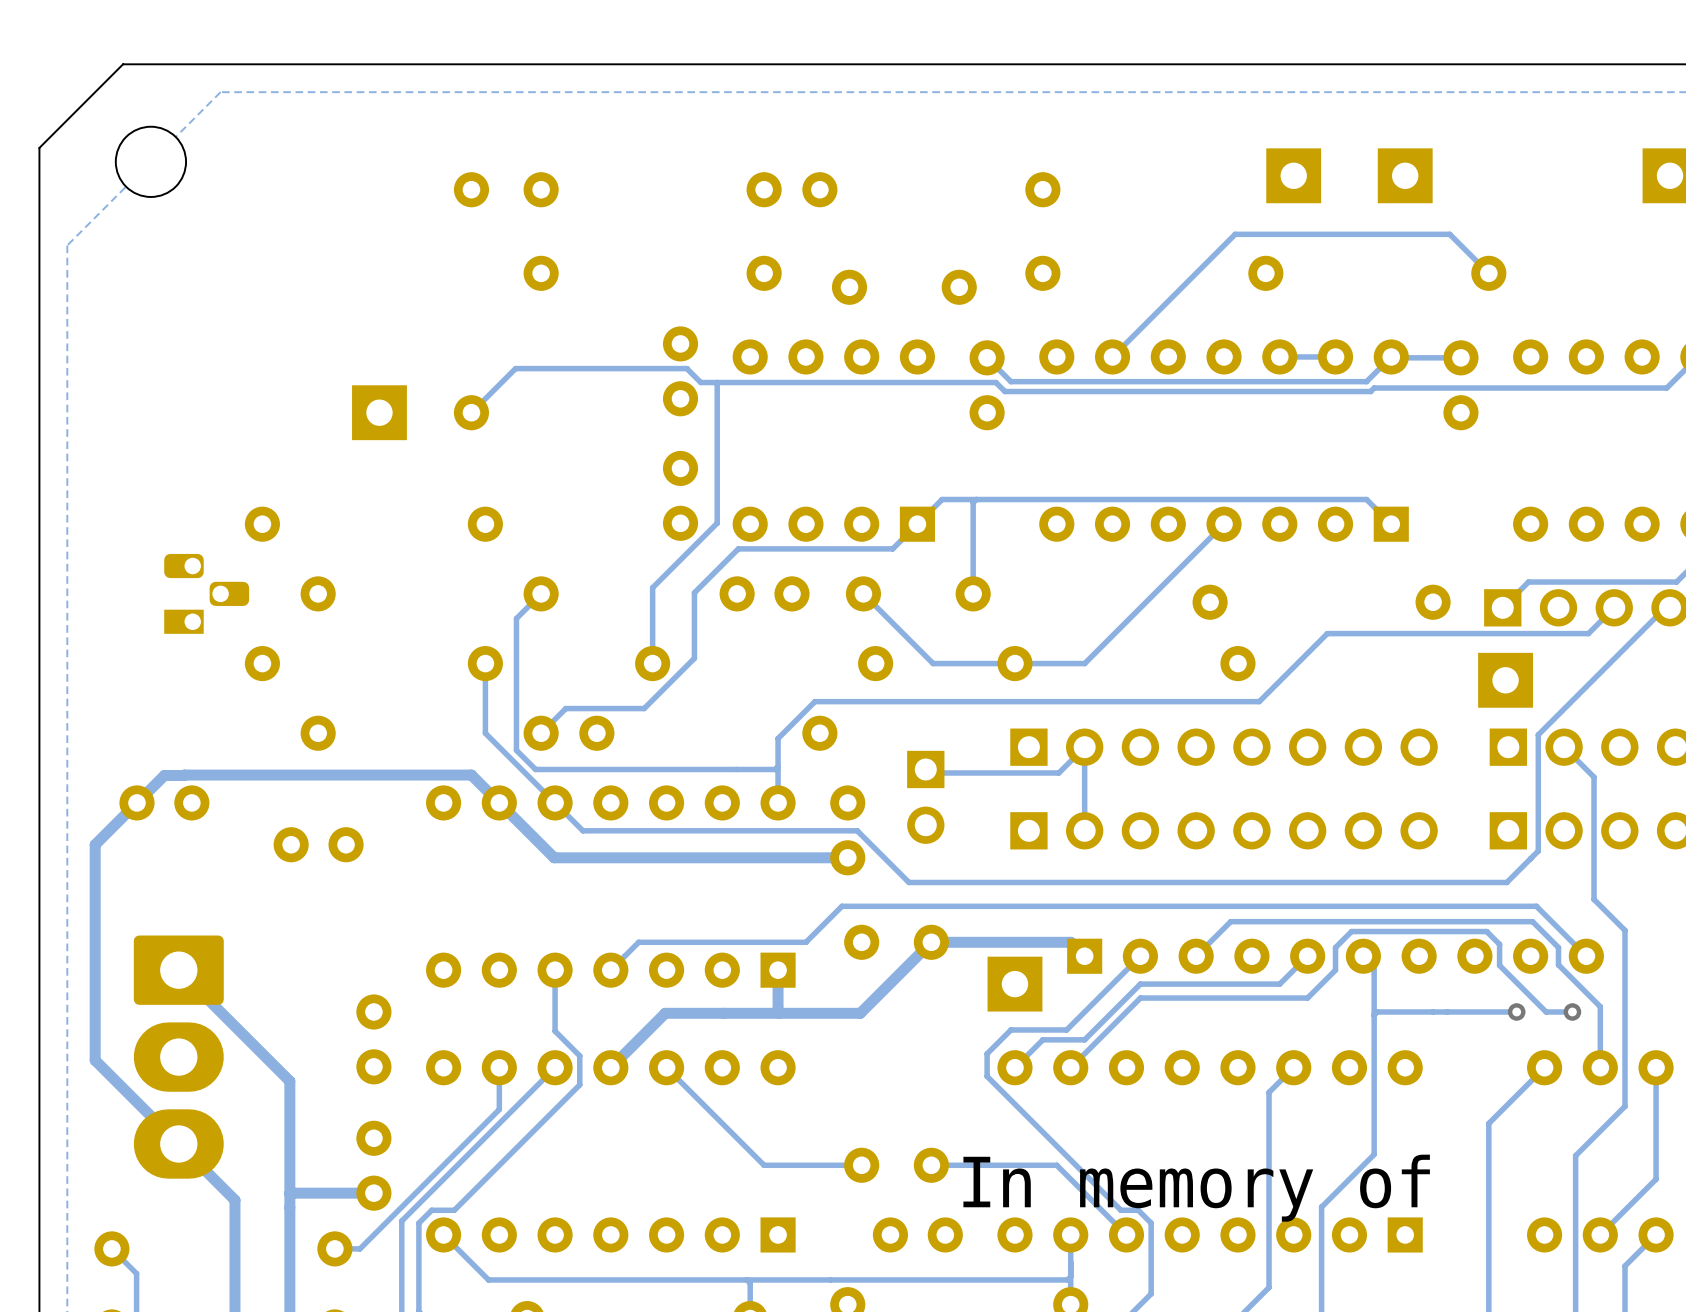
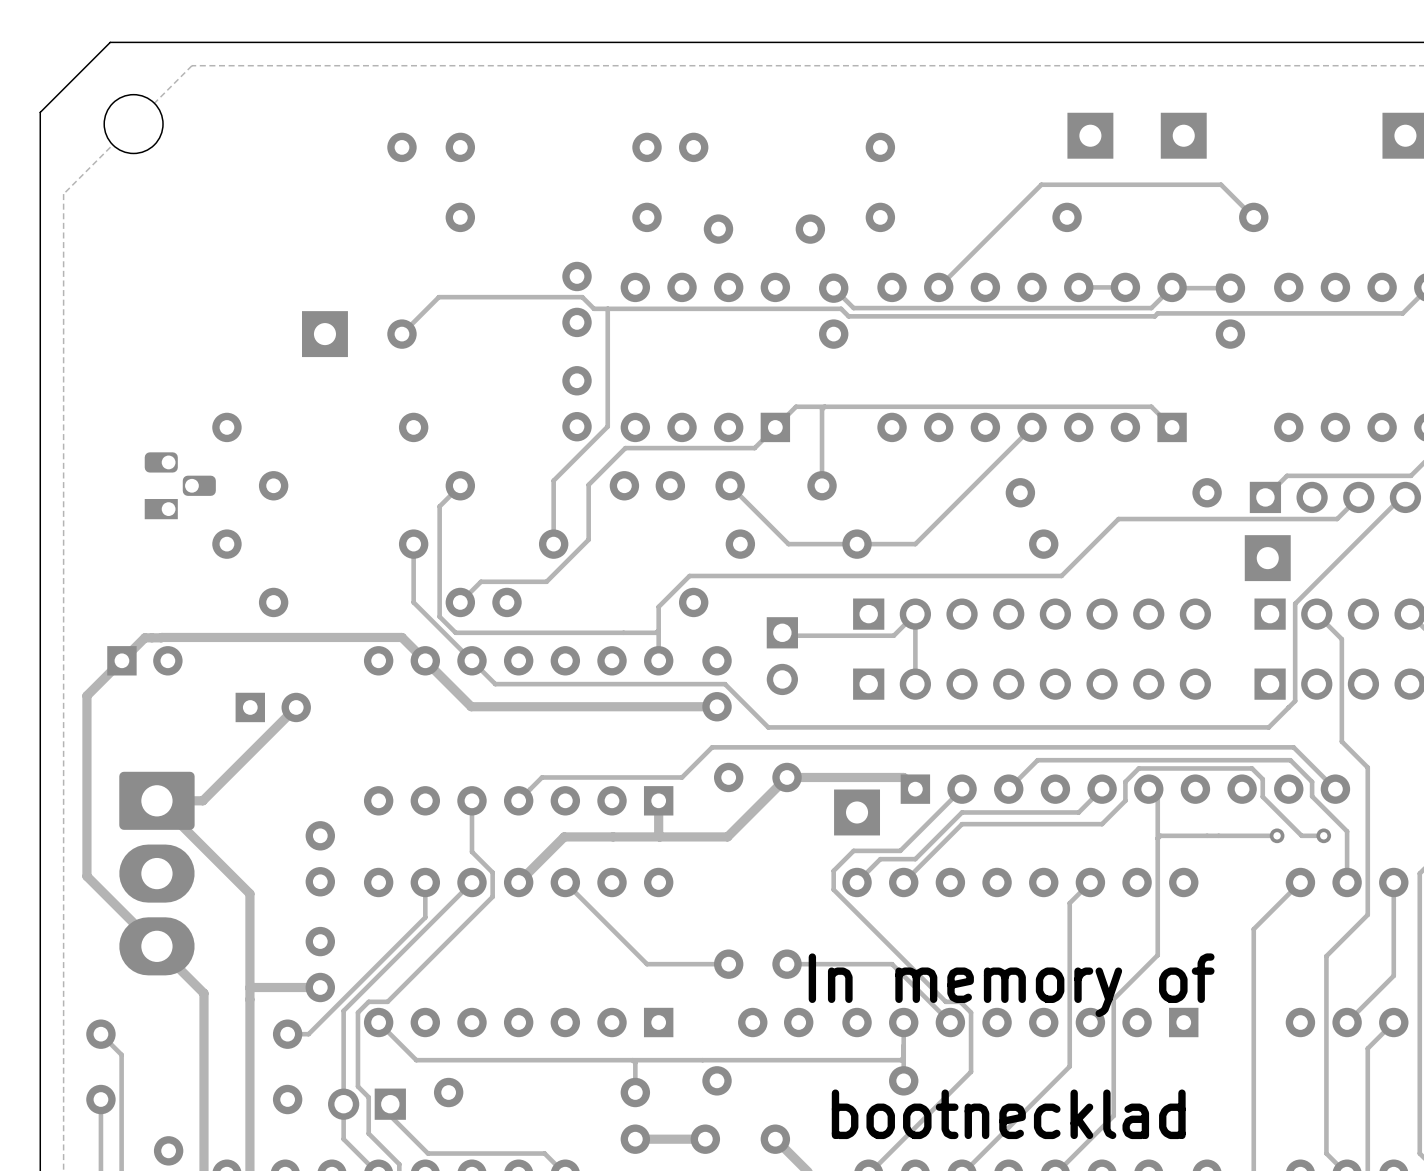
part footprint: [119, 785, 210, 821] -> [107, 646, 183, 676]
part footprint: [273, 827, 364, 863] -> [235, 692, 311, 723]
track: none -> (296, 707) (202, 800) (156, 800)

